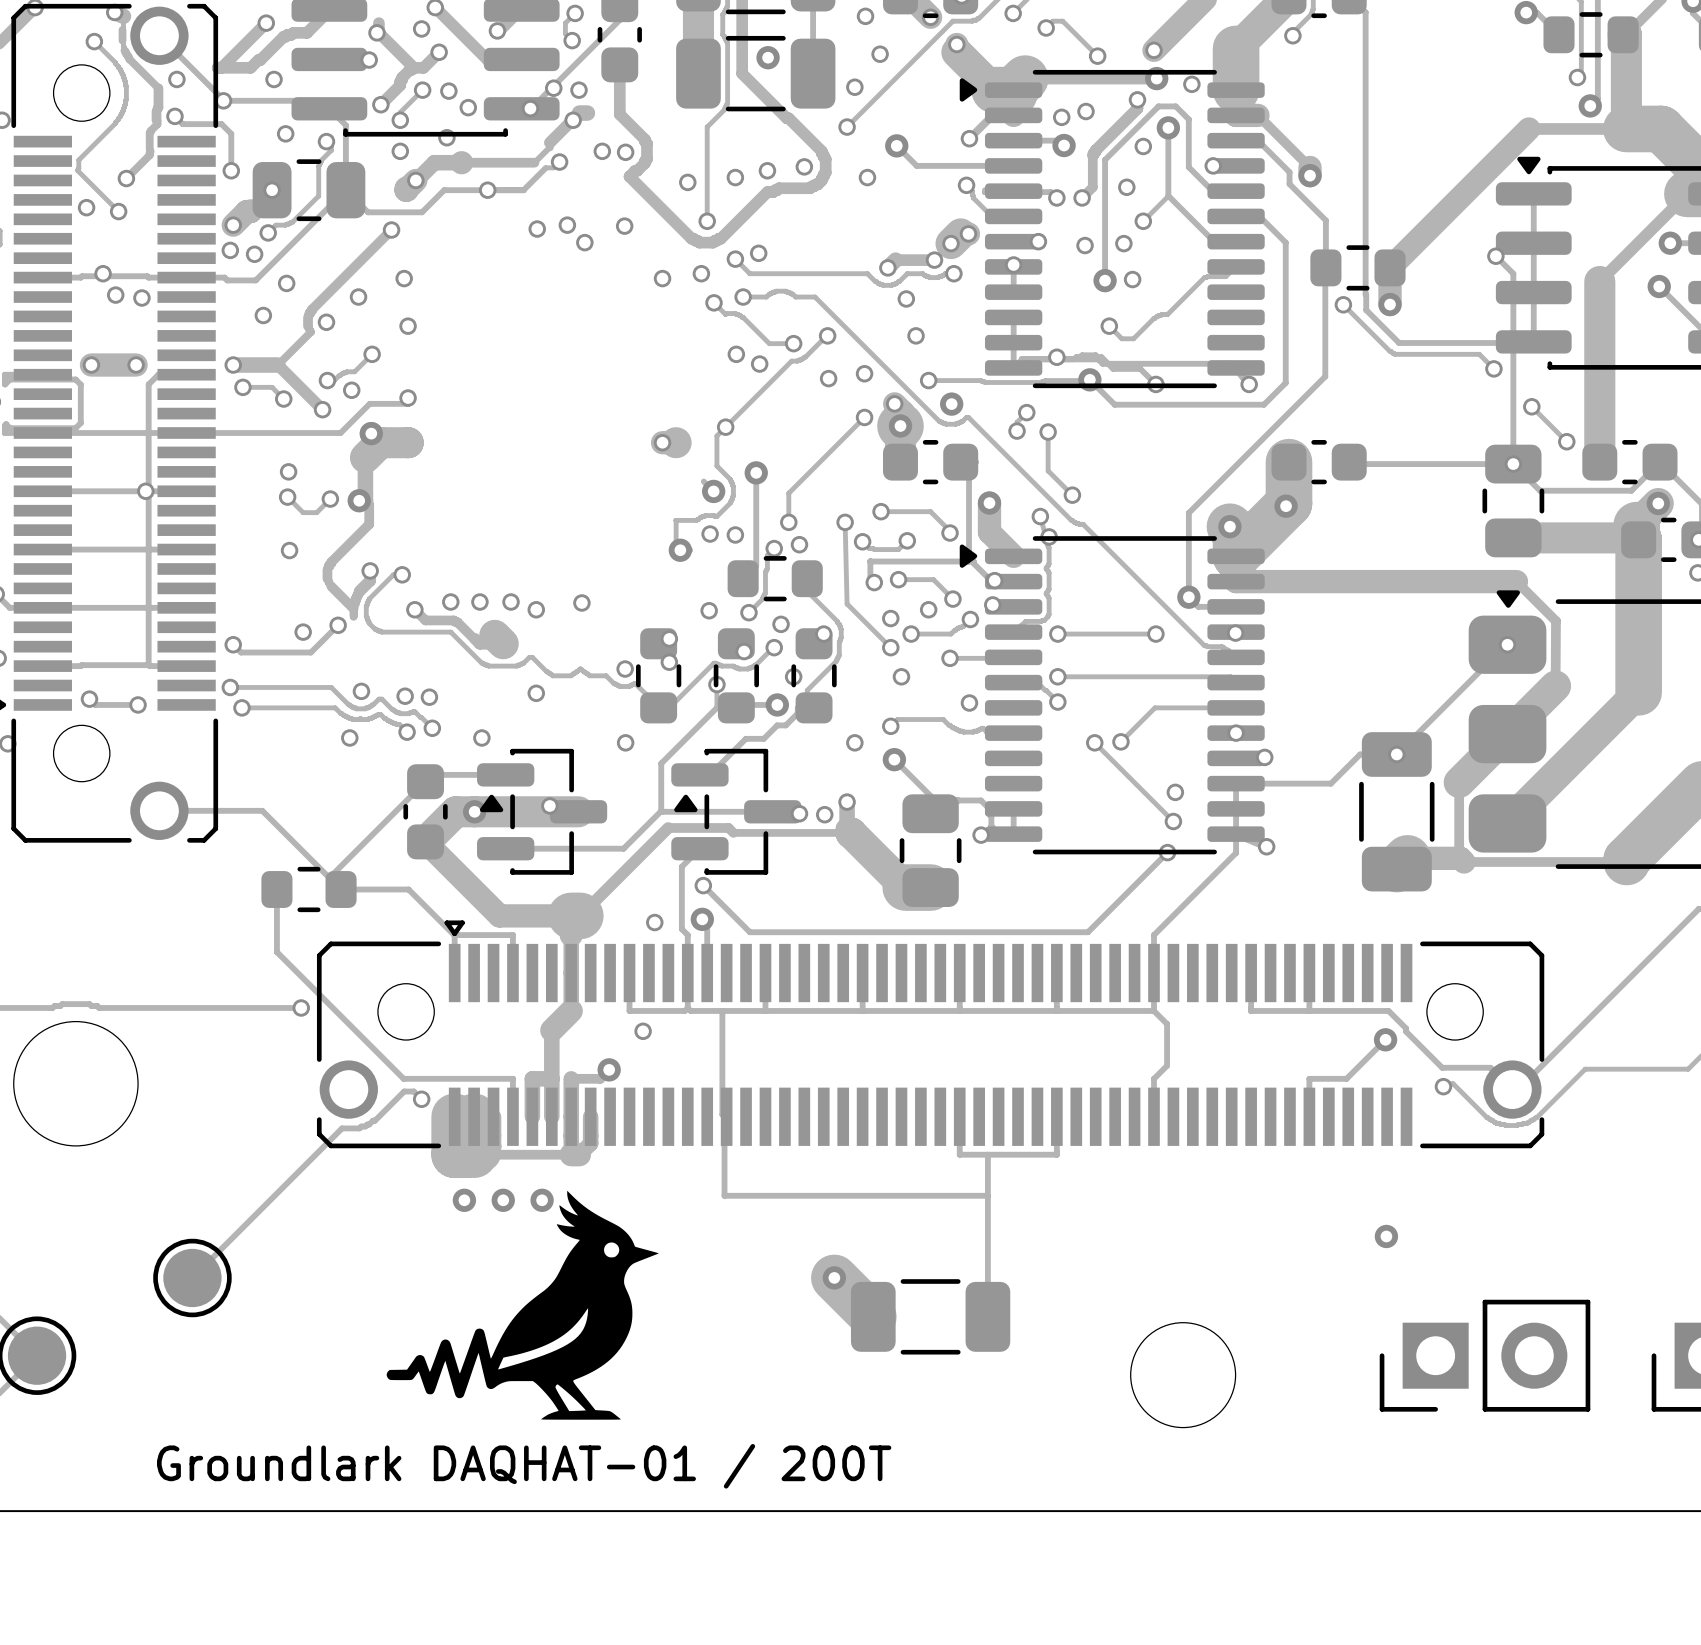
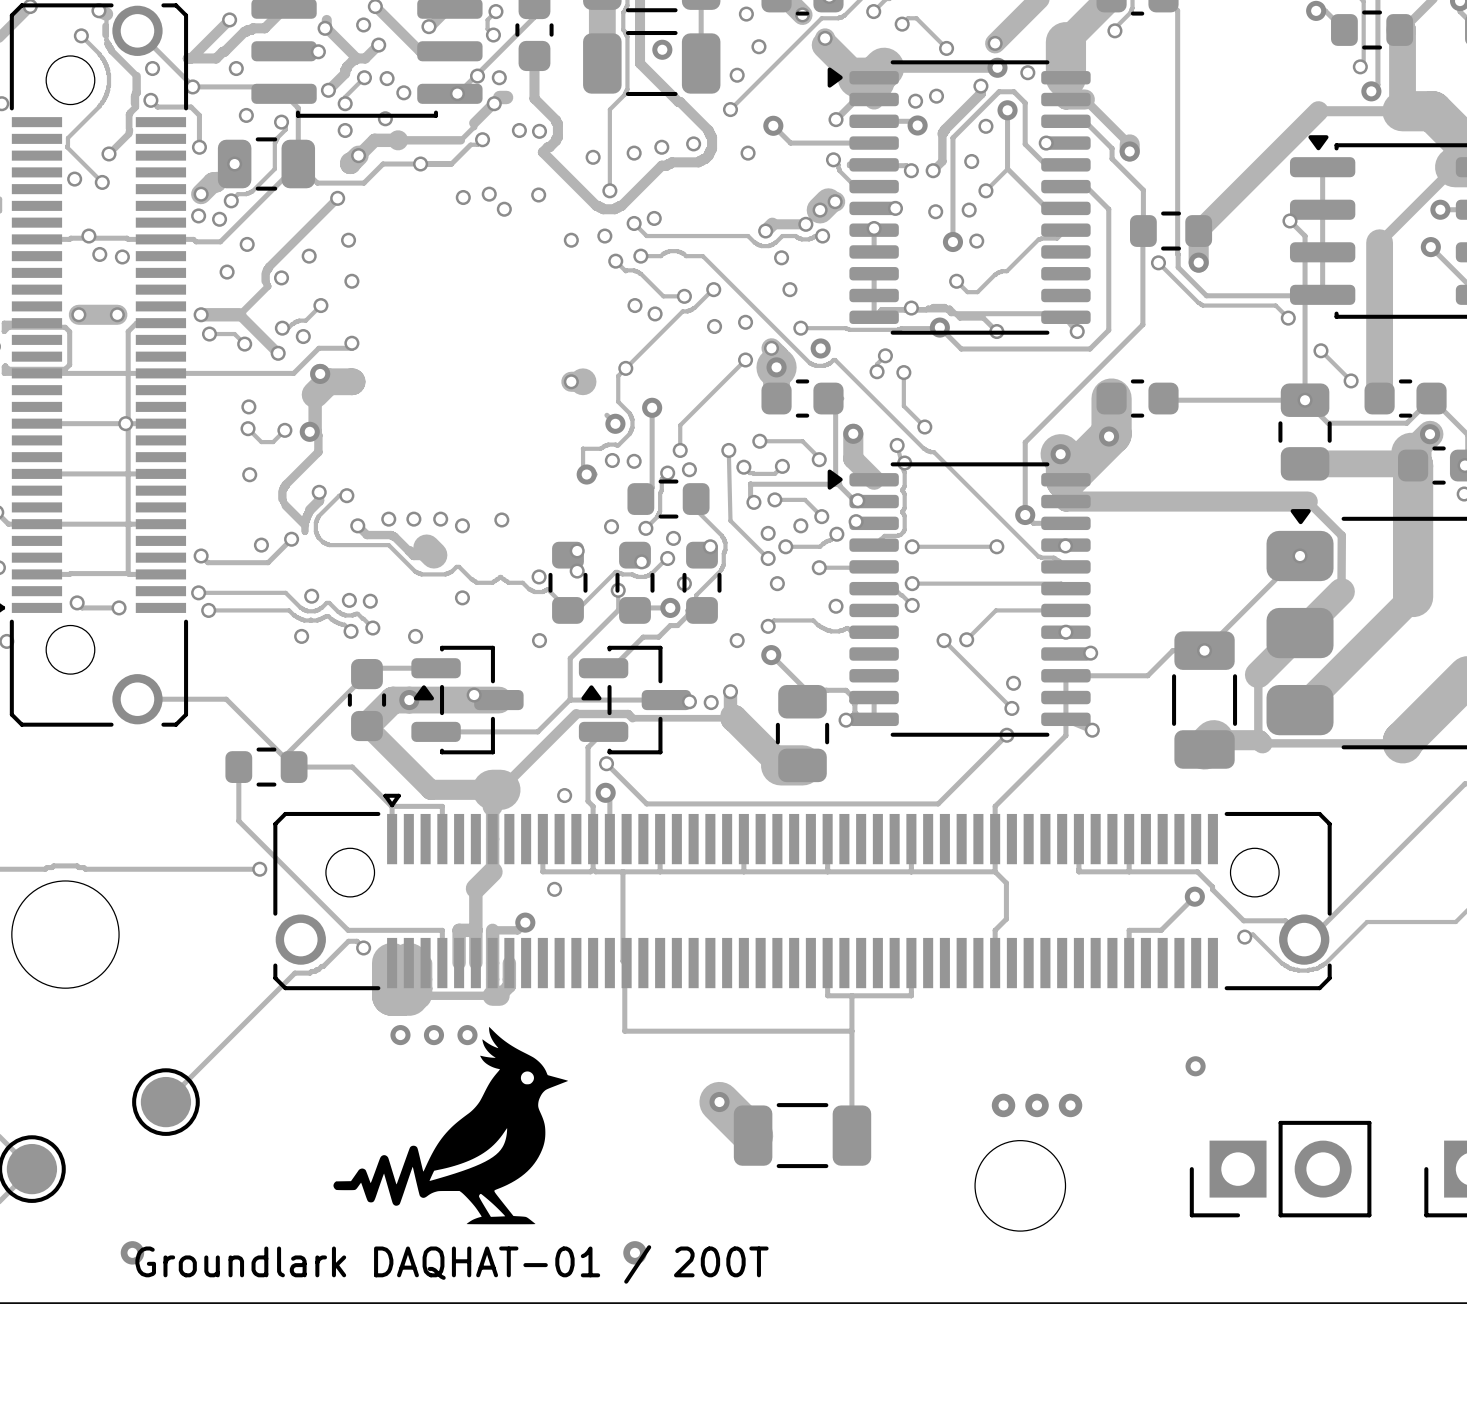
via: none -> (1003, 1105)
via: none -> (1037, 1105)
via: none -> (1070, 1105)
via: none -> (132, 1252)
via: none -> (634, 1252)

